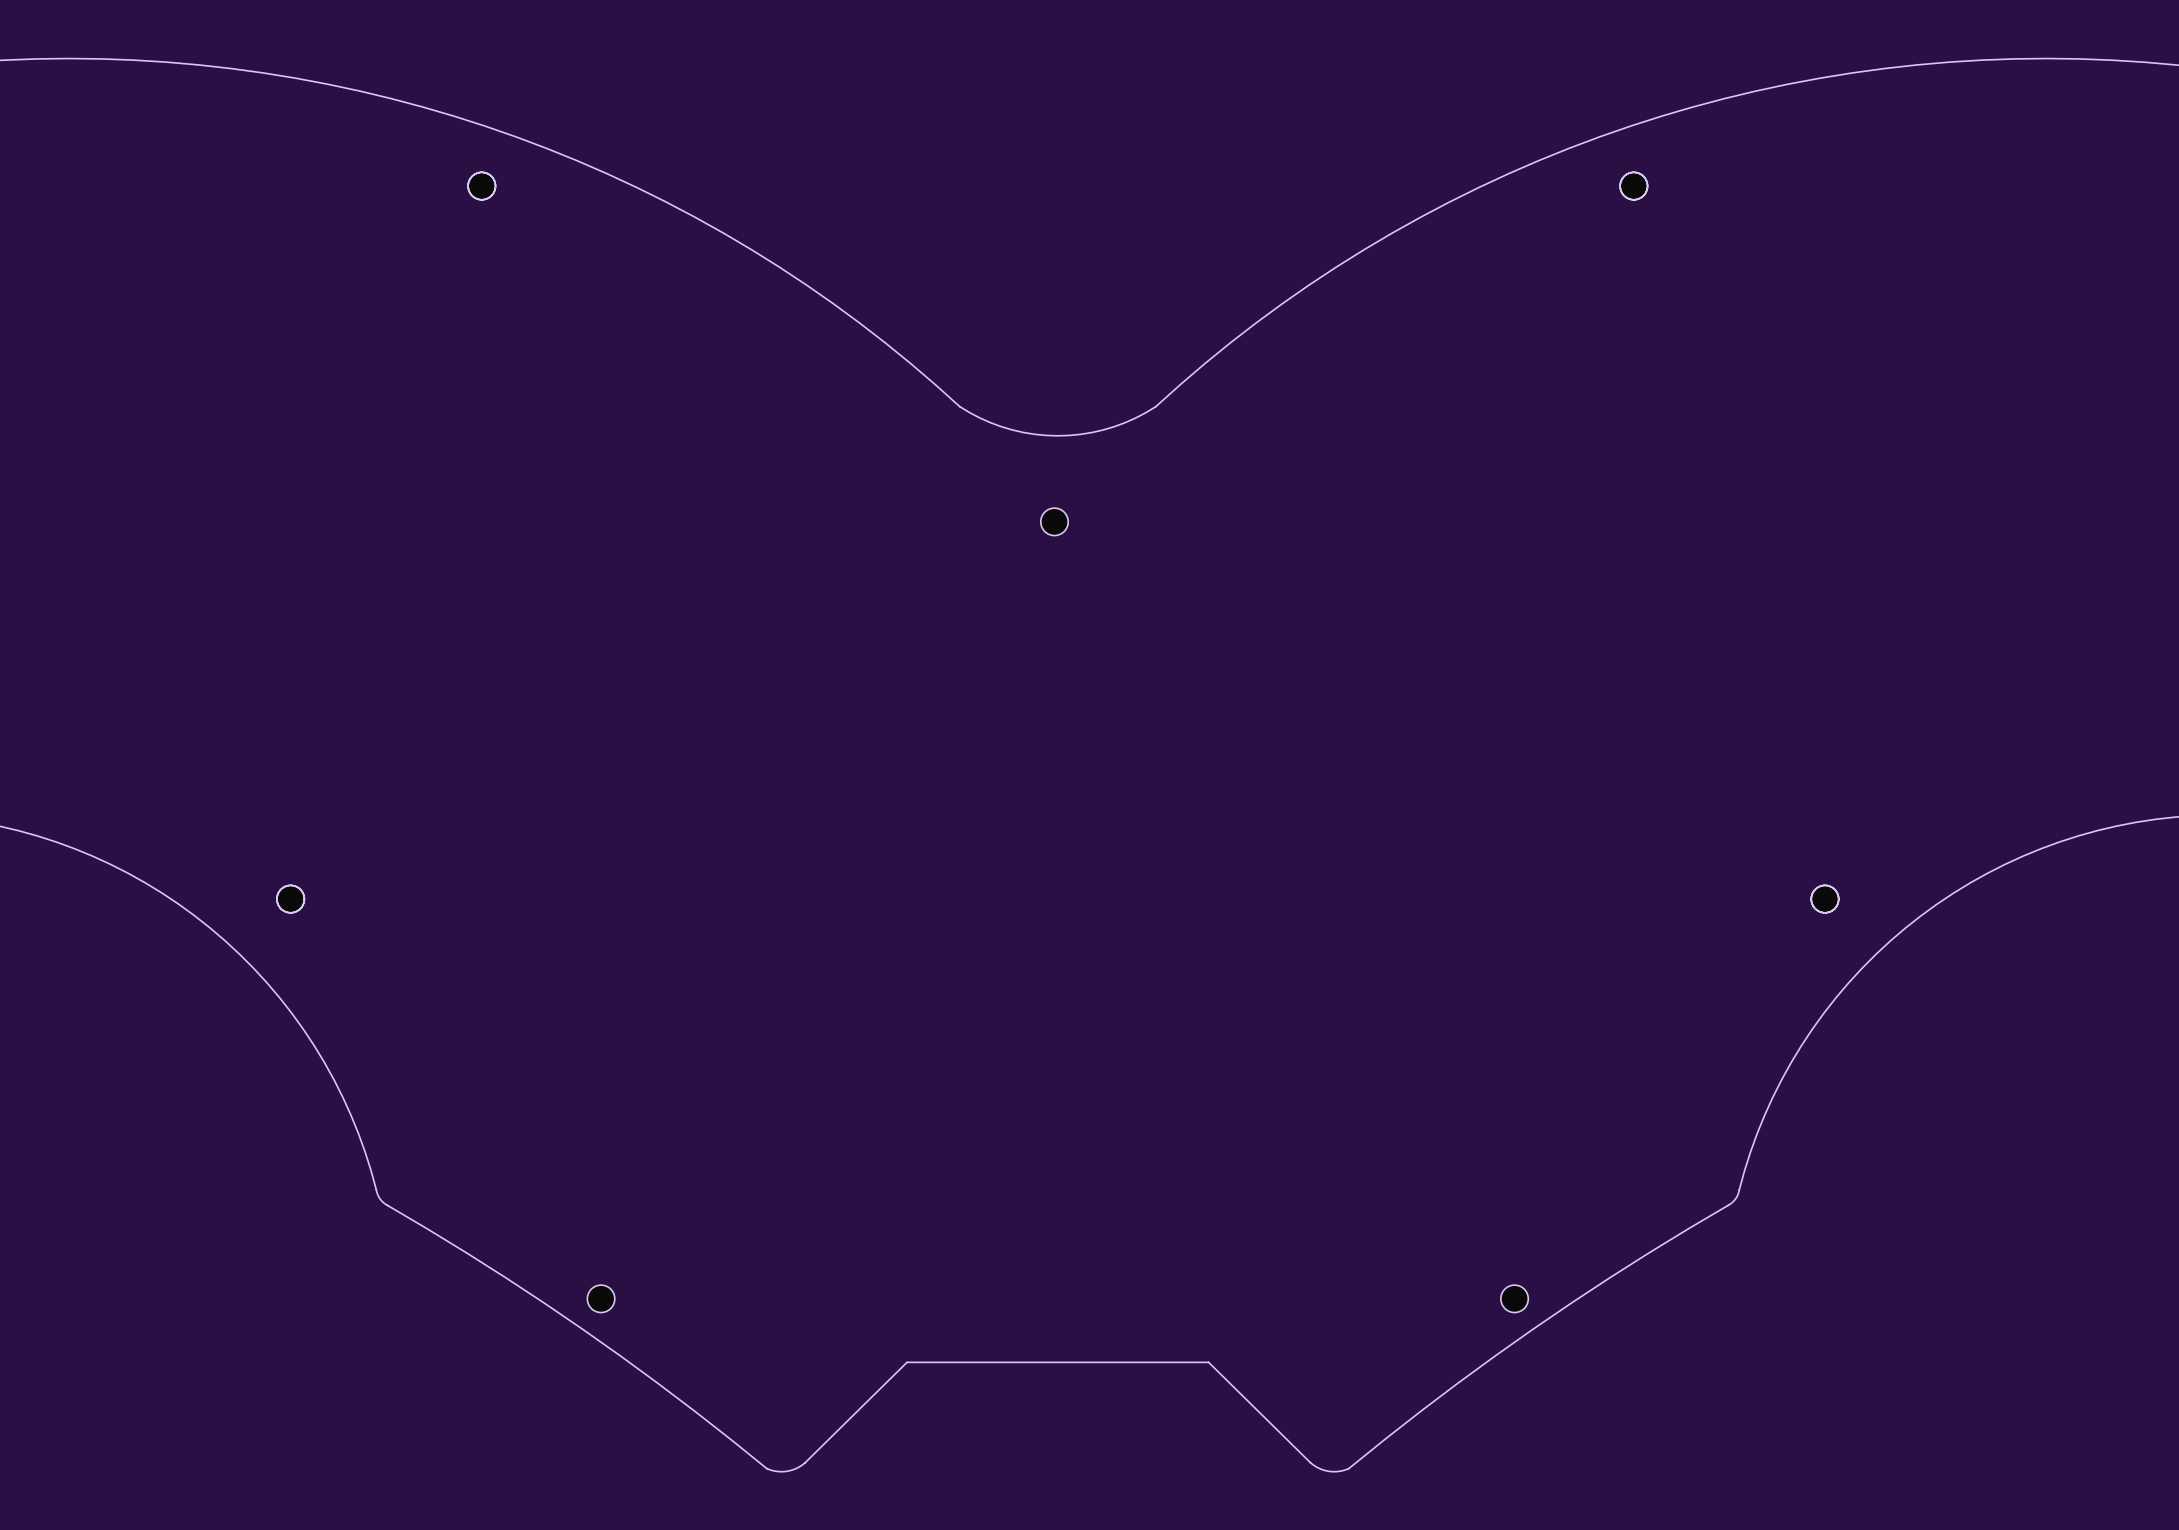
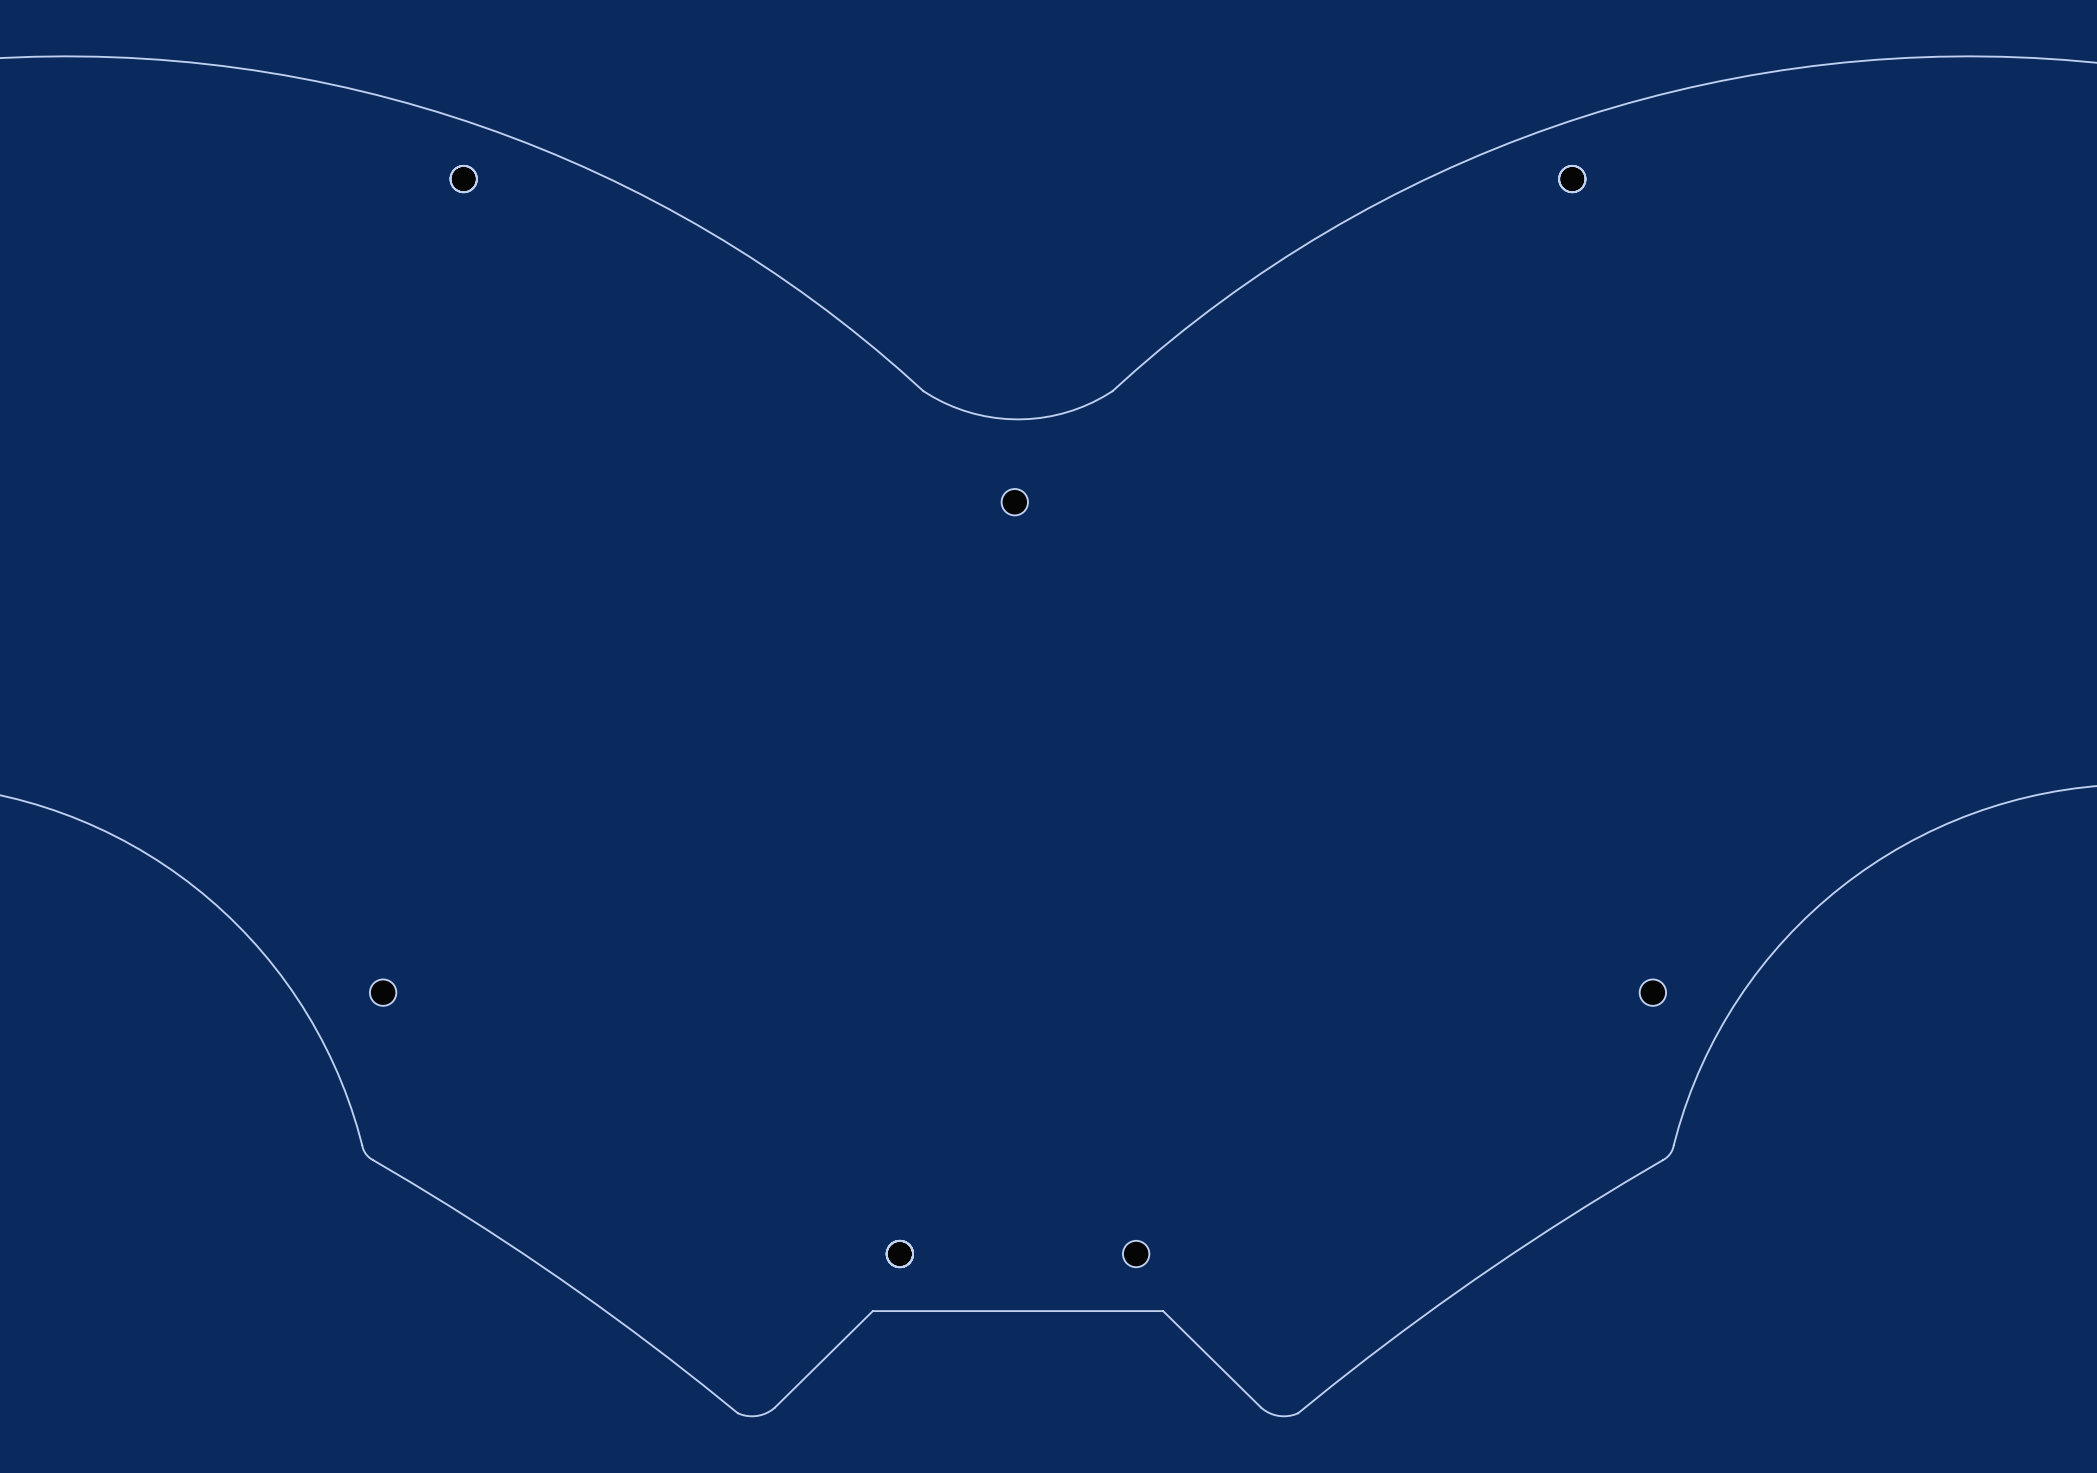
part: (290, 899) -> none
part: (1824, 899) -> none
part: none -> (383, 992)
part: none -> (1652, 992)
part: (601, 1298) -> none
part: (1514, 1298) -> none
part: none -> (899, 1254)
part: none -> (1136, 1254)

